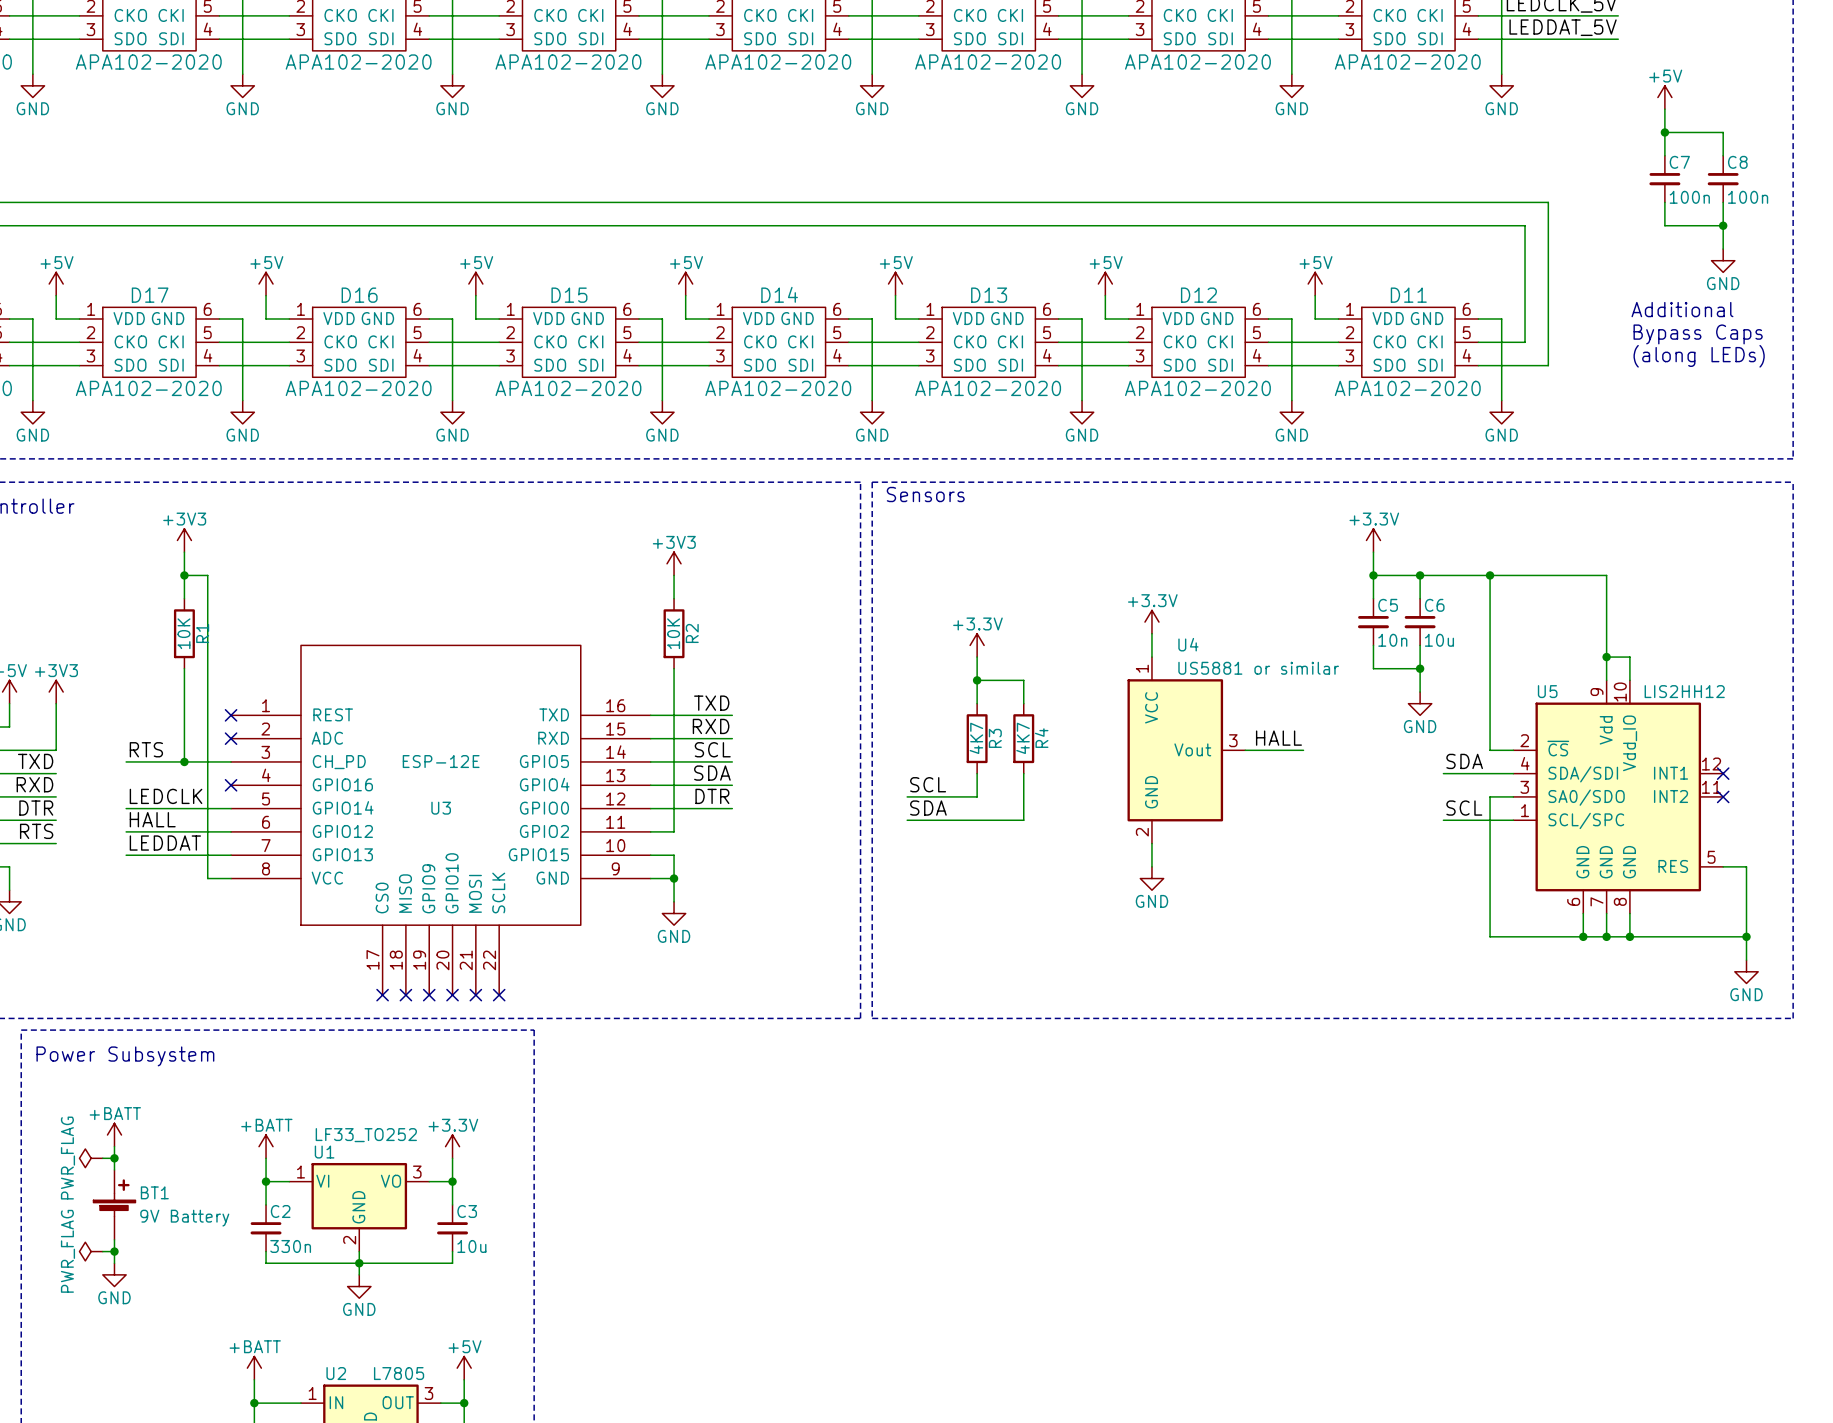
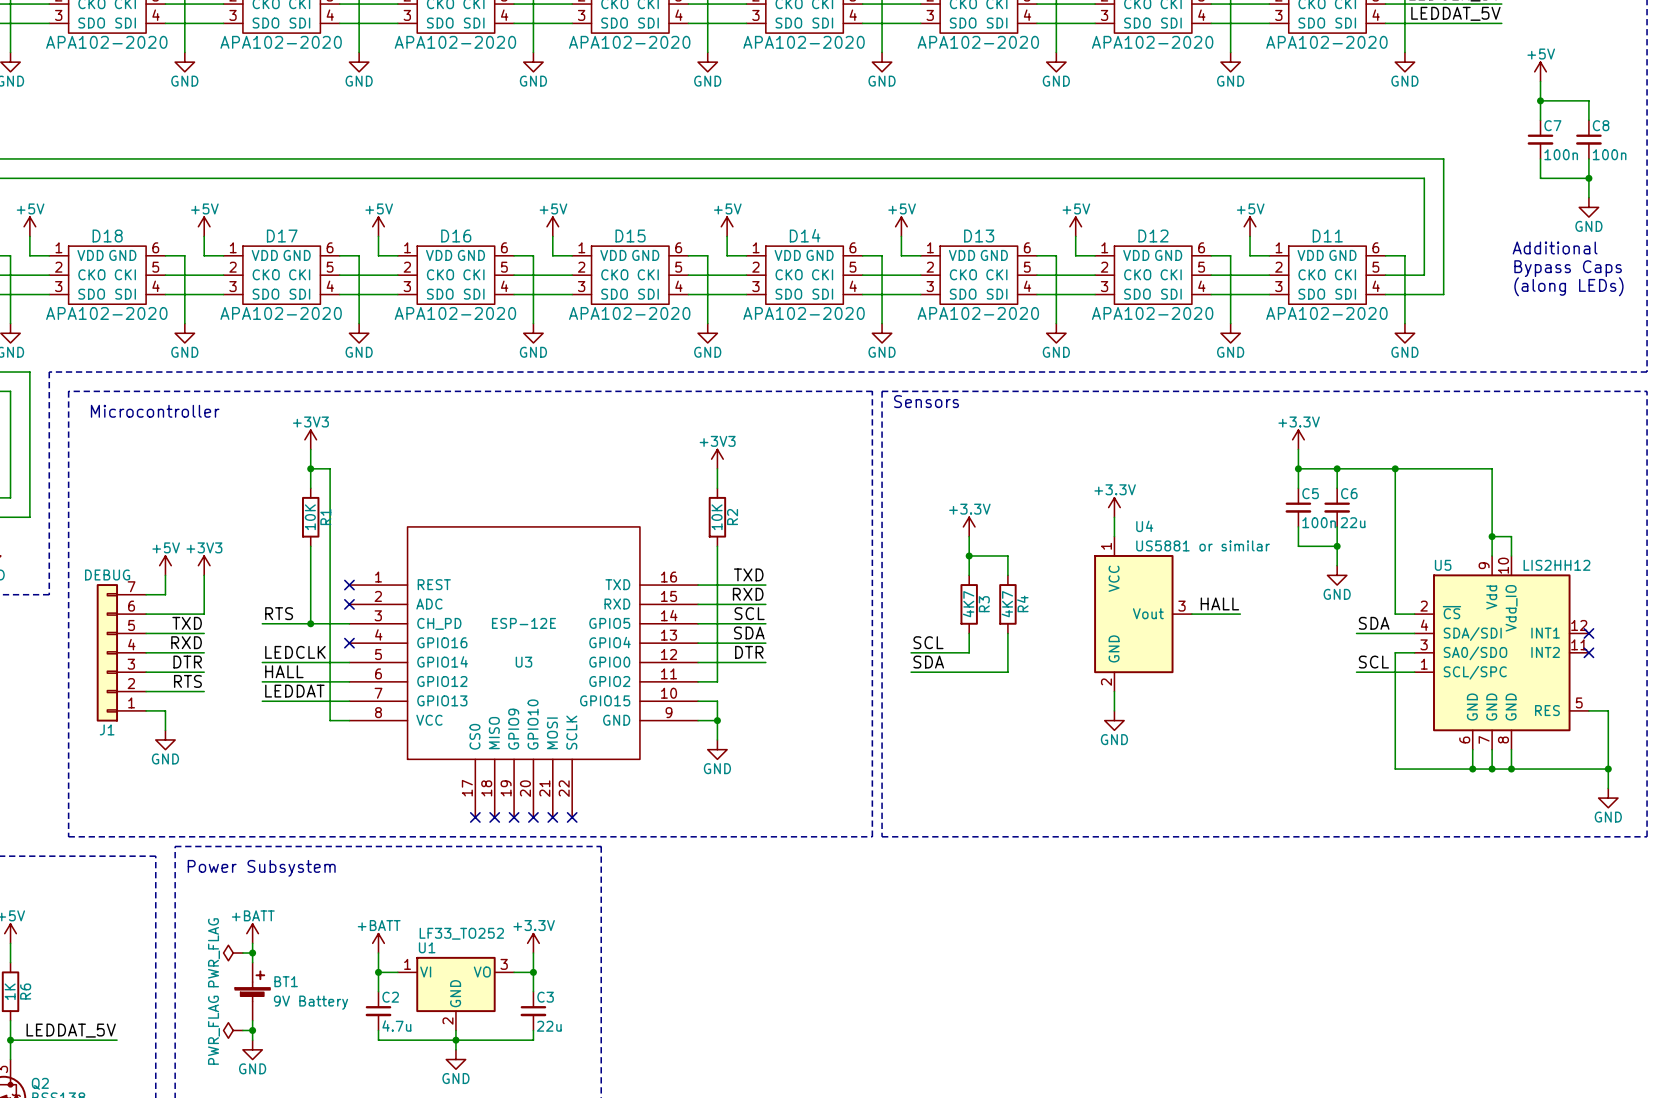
C5 value: 10n (1392, 640) -> 100n (1319, 522)
C6 value: 10u (1439, 640) -> 22u (1353, 522)
C2 value: 330n (290, 1246) -> 4.7u (396, 1026)
C3 value: 10u (471, 1246) -> 22u (549, 1026)

